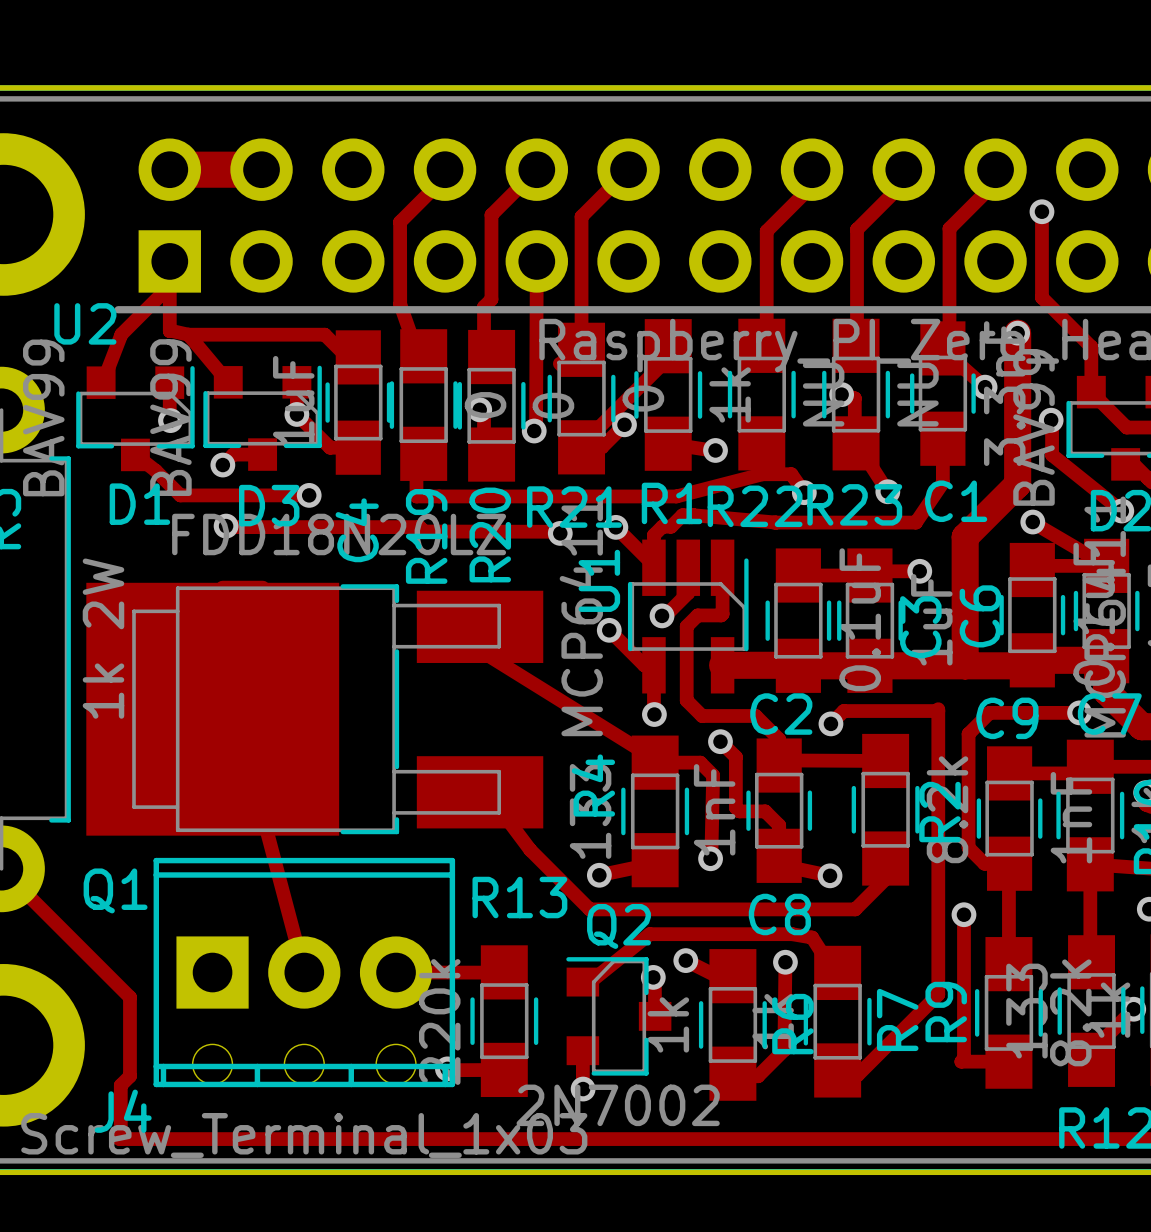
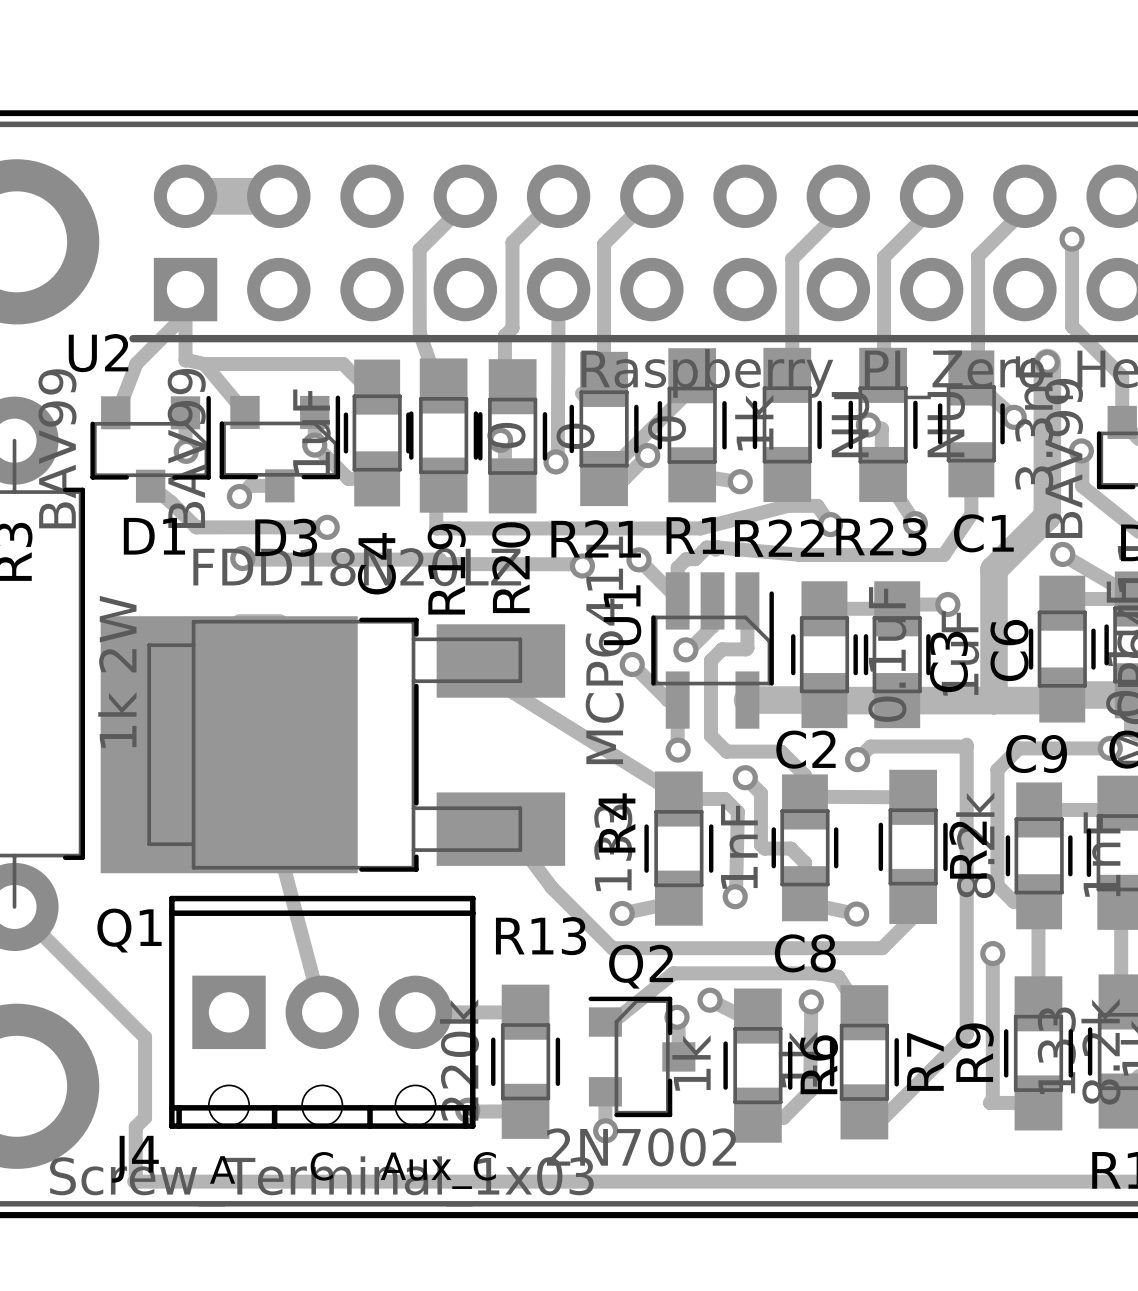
text: none -> C (321, 1166)
text: none -> Aux_C (438, 1170)
text: none -> A (222, 1169)

